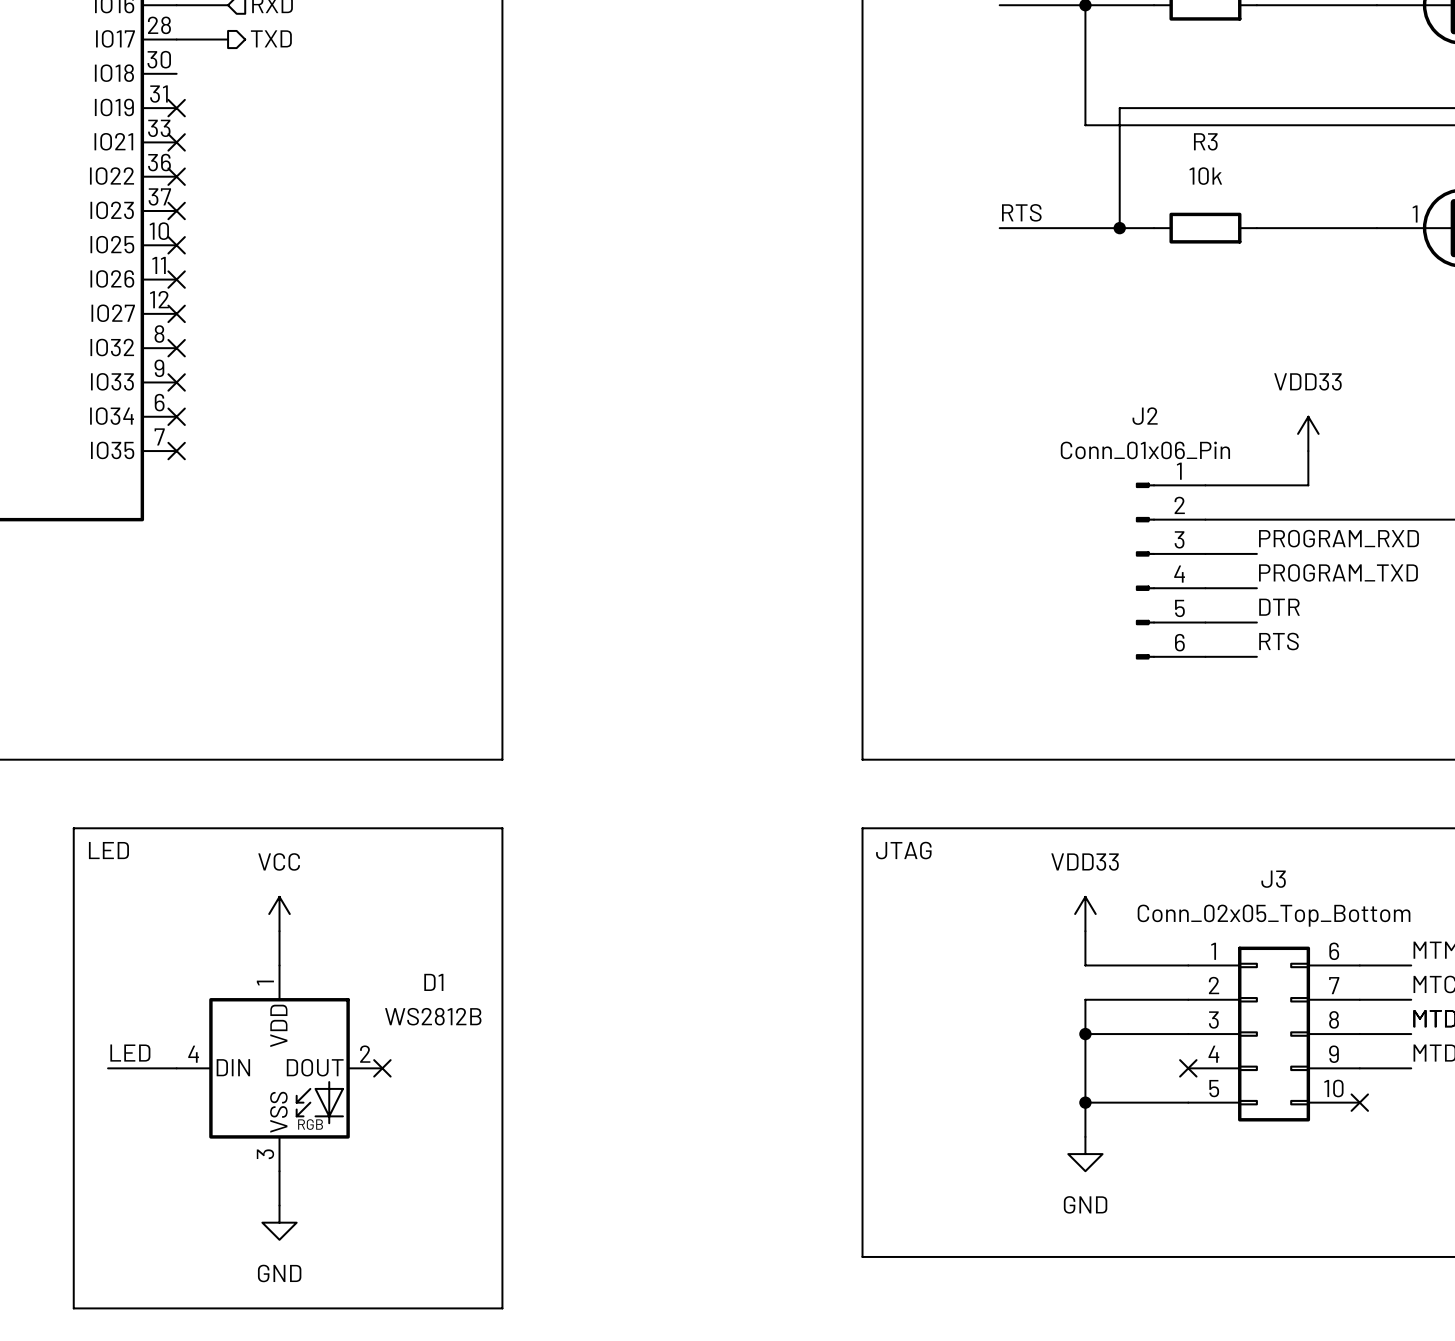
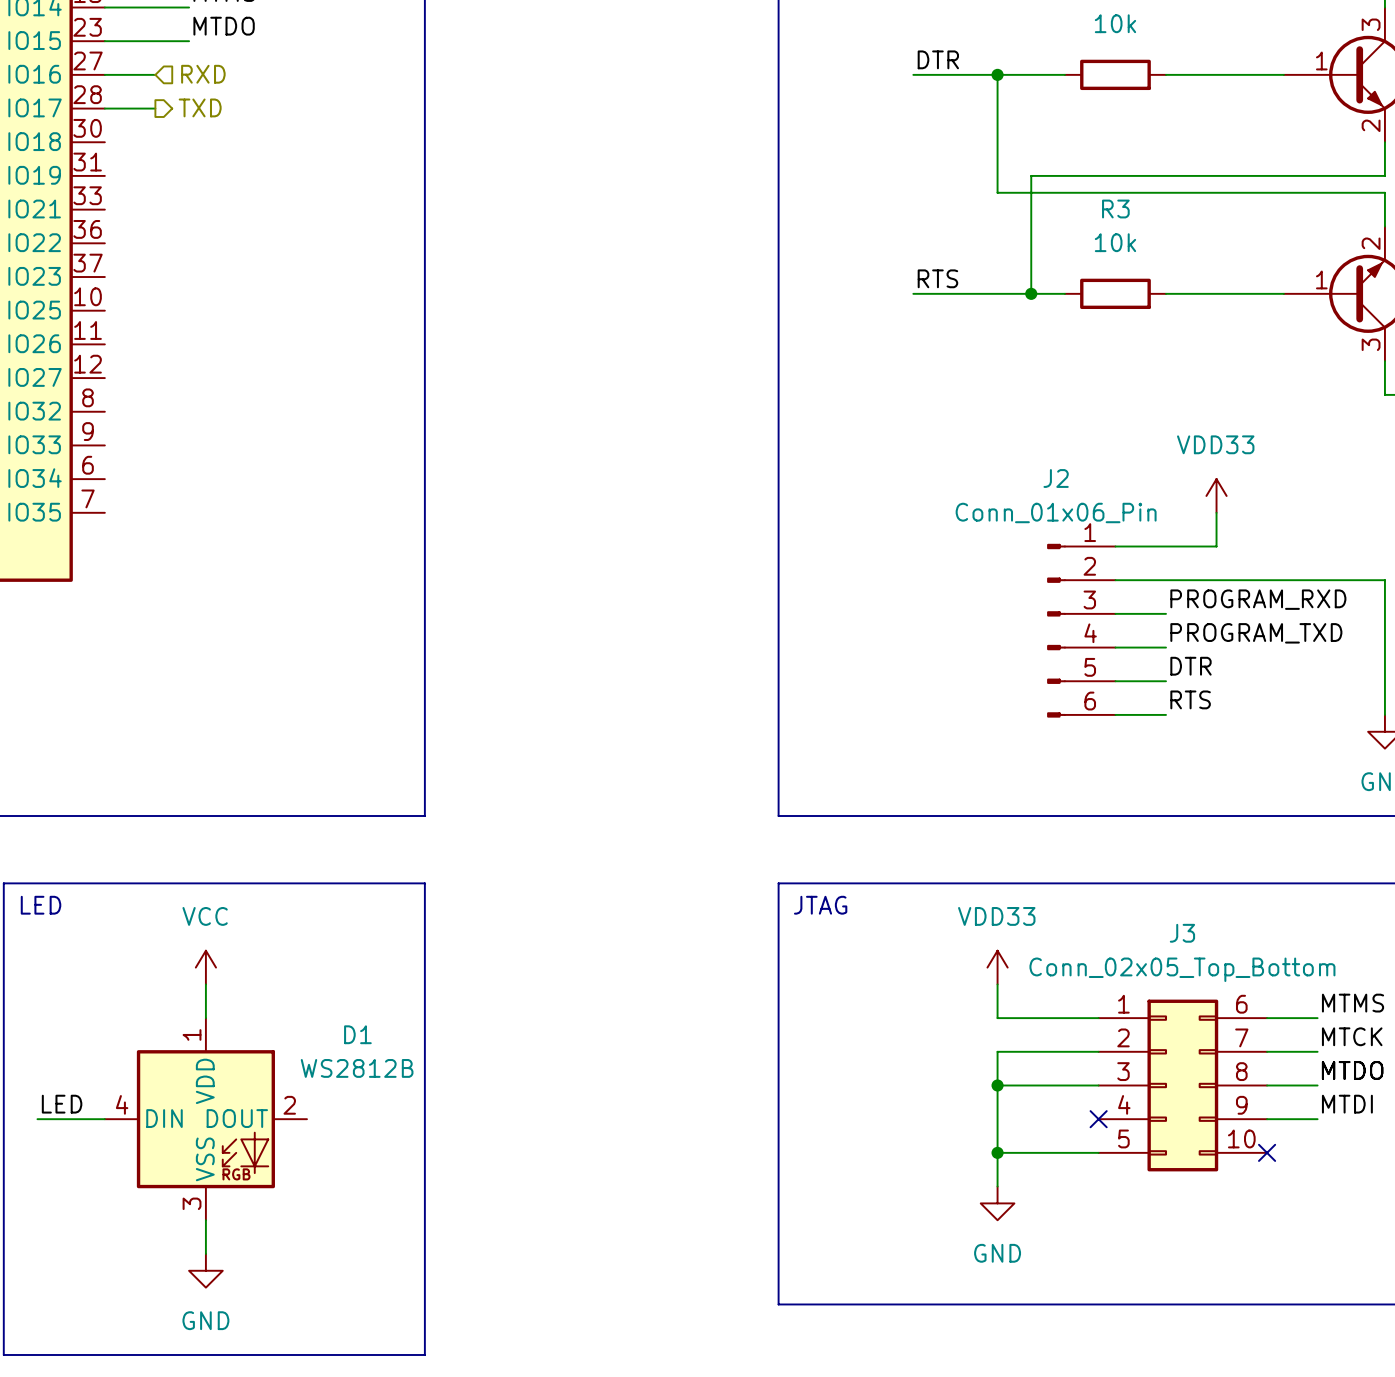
no-connect mark: (176, 108) -> none
no-connect mark: (176, 142) -> none
no-connect mark: (176, 176) -> none
no-connect mark: (176, 210) -> none
no-connect mark: (176, 245) -> none
no-connect mark: (176, 279) -> none
no-connect mark: (176, 313) -> none
no-connect mark: (176, 348) -> none
no-connect mark: (176, 382) -> none
no-connect mark: (176, 416) -> none
no-connect mark: (176, 451) -> none
no-connect mark: (382, 1068) -> none

